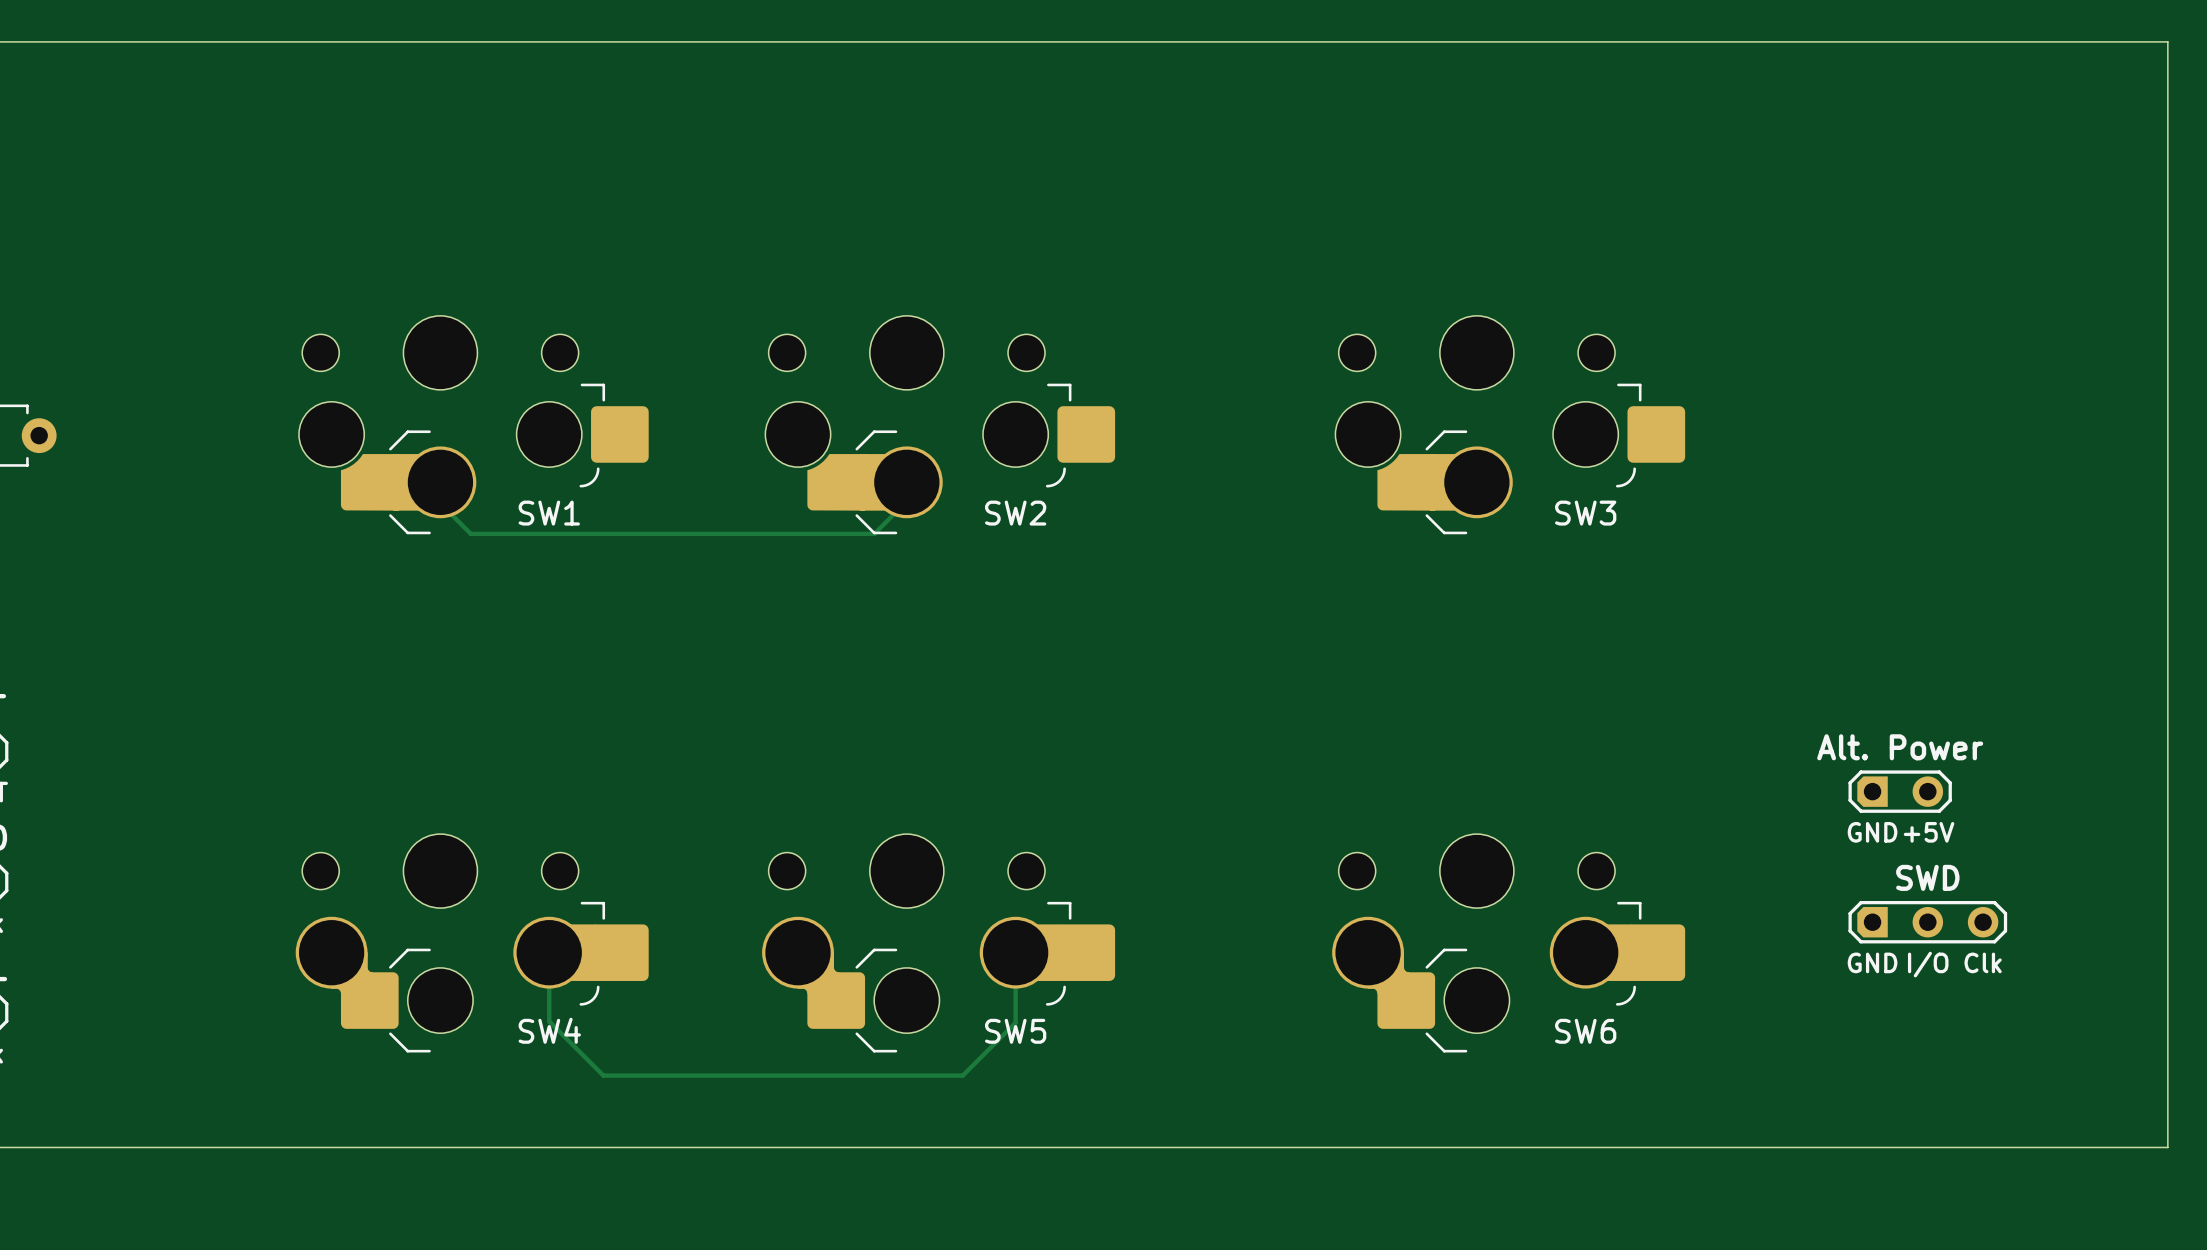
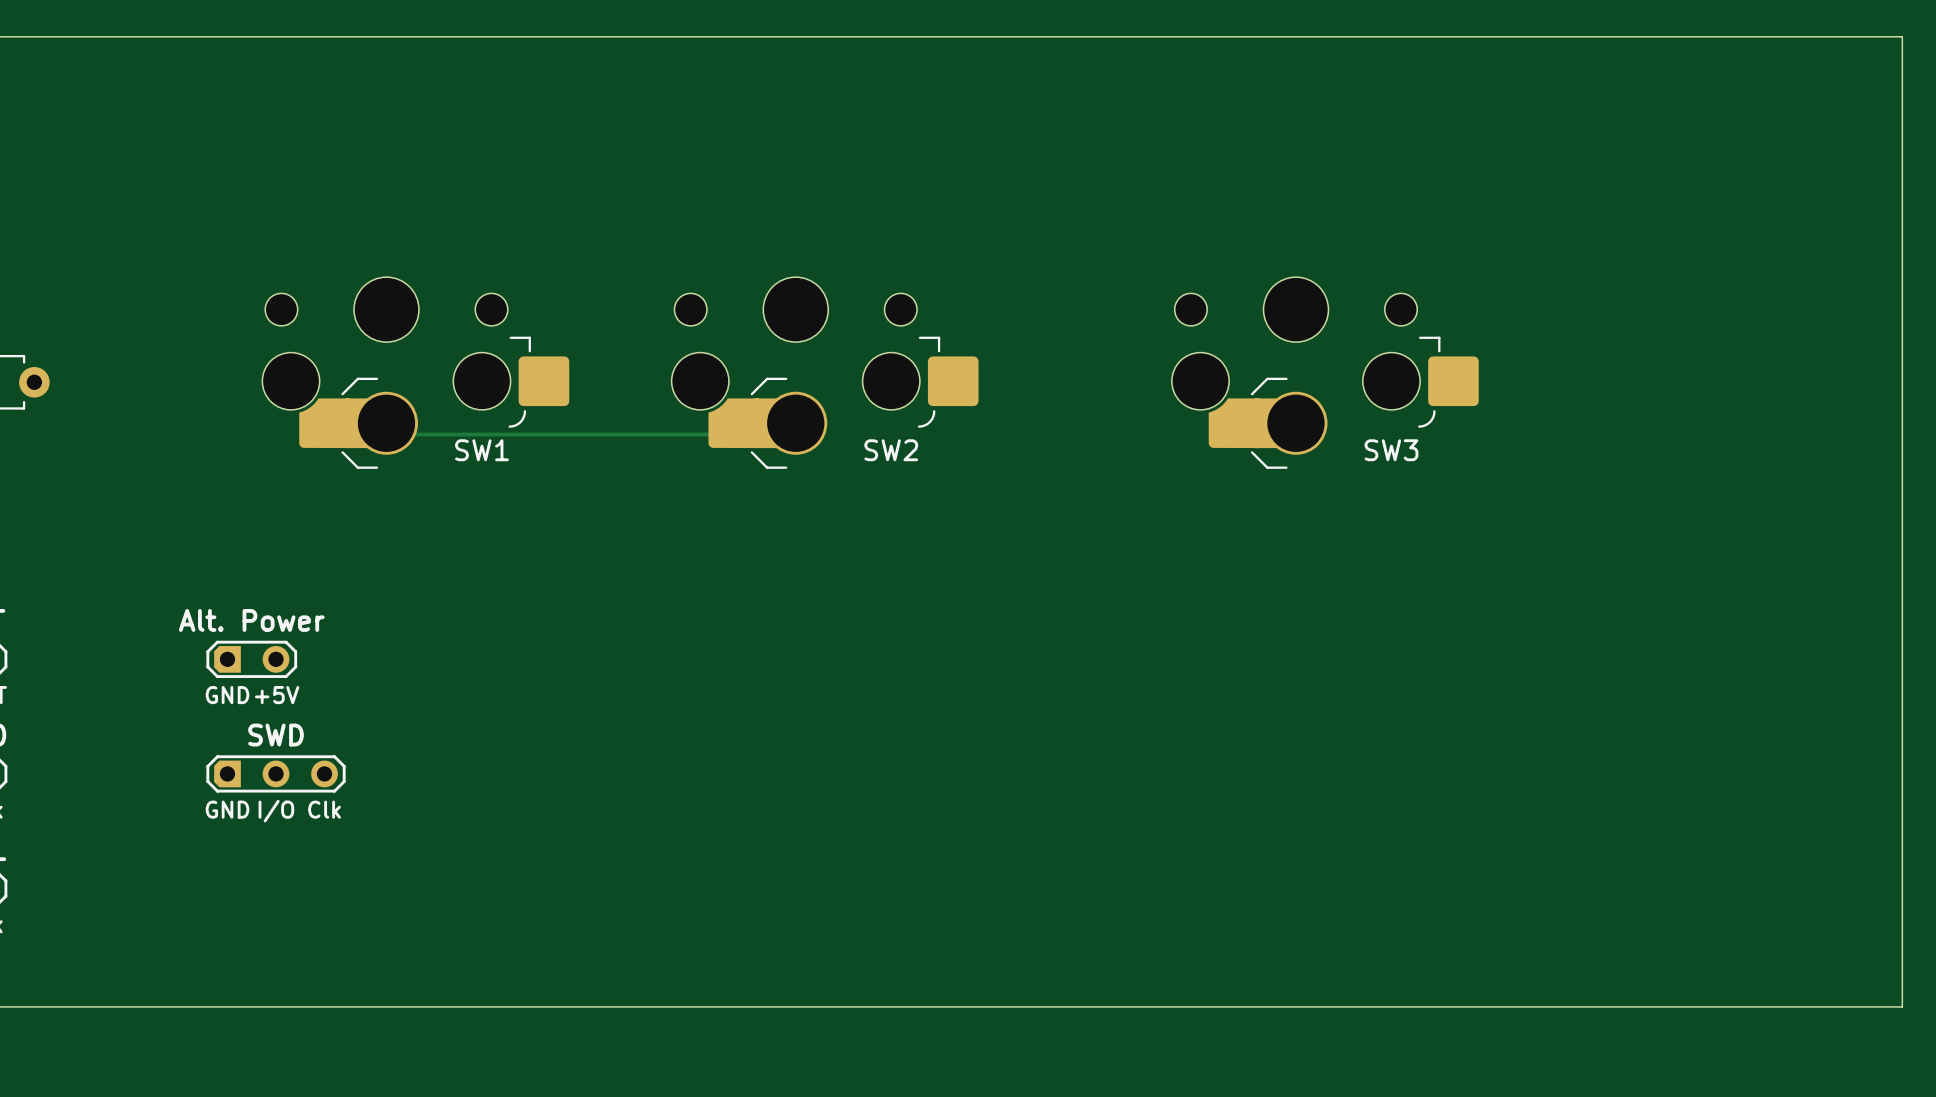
track: (440, 482) (440, 503) (470, 533) (874, 533) (906, 501) (906, 482) -> (386, 423) (397, 434) (784, 434) (795, 423)
part: none -> Alt. Power (251, 659)
part: Alt. Power (1900, 791) -> none
part: none -> SWD (276, 773)
part: SWD (1927, 922) -> none
SW4: (472, 943) -> none
SW5: (938, 943) -> none
SW6: (1508, 943) -> none
track: (549, 952) (549, 1021) (603, 1075) (962, 1075) (1015, 1022) (1015, 952) -> none

